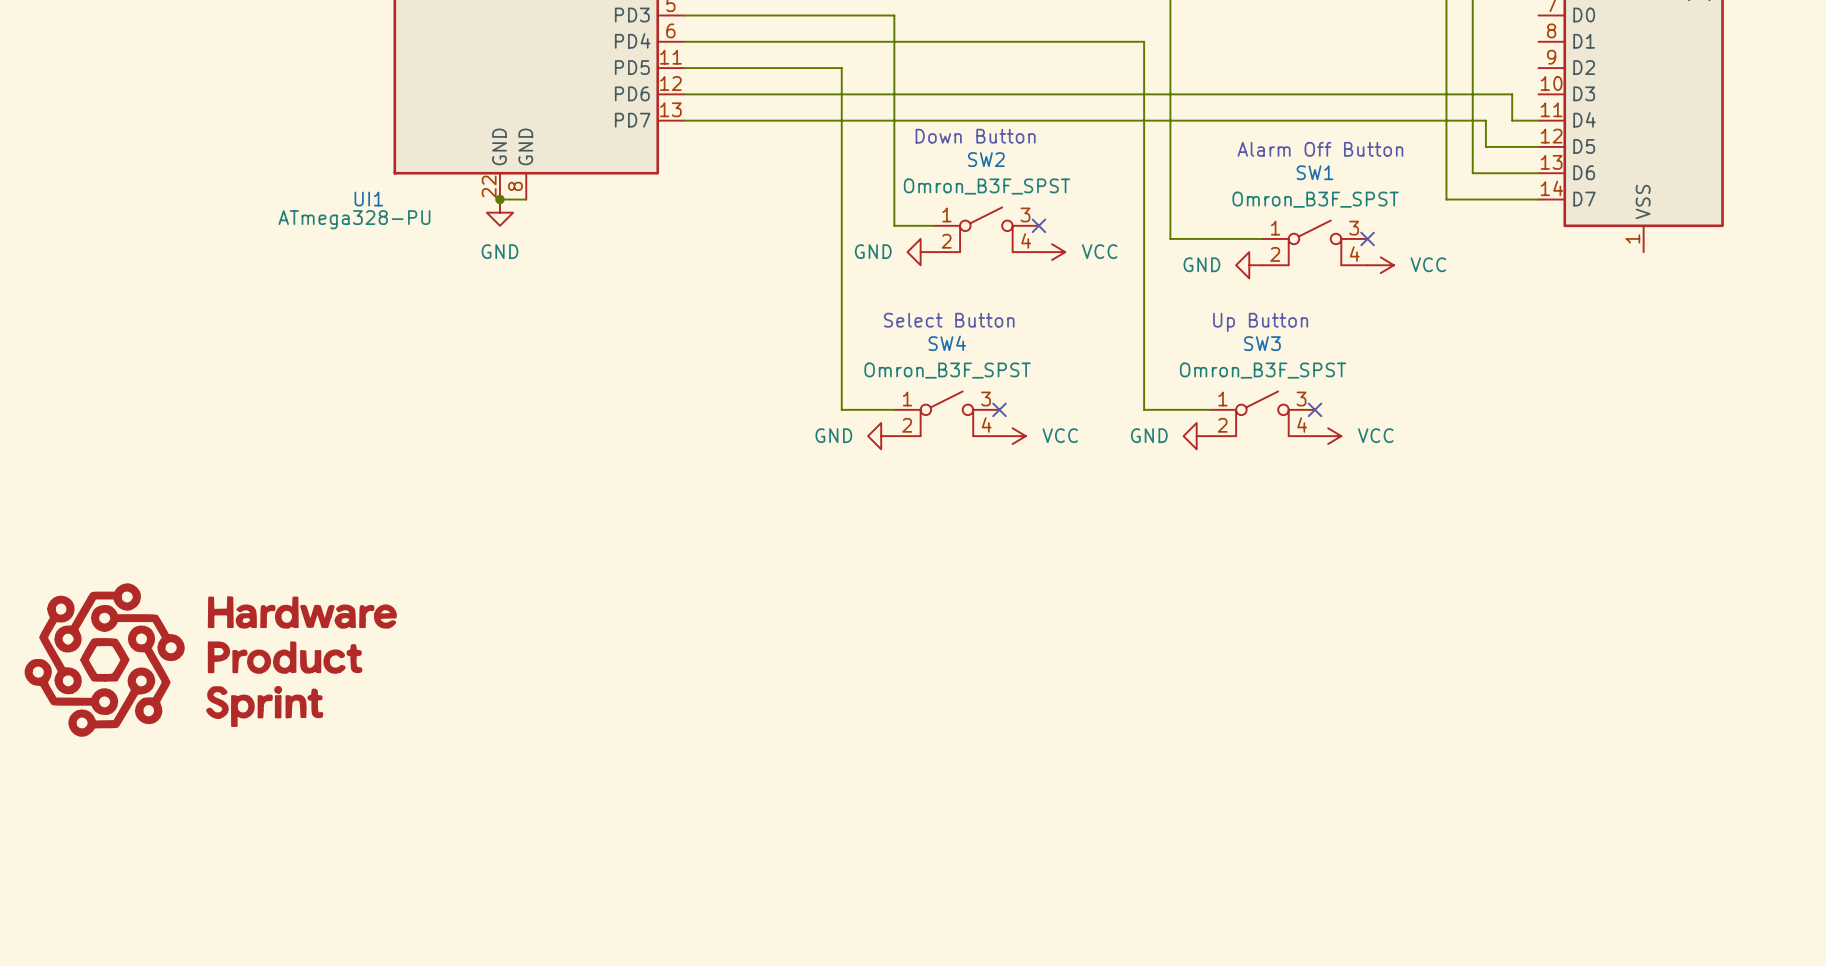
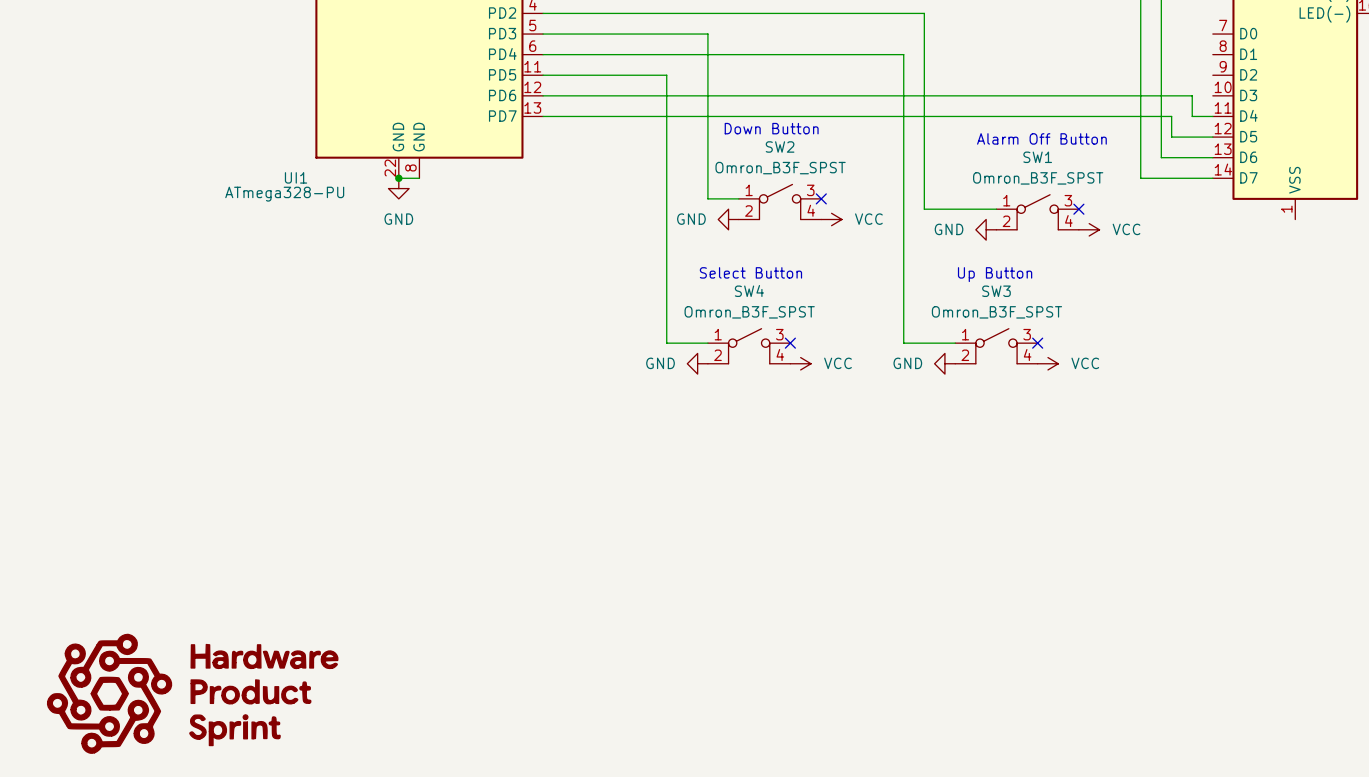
power symbol position: (210, 660) -> (192, 693)

